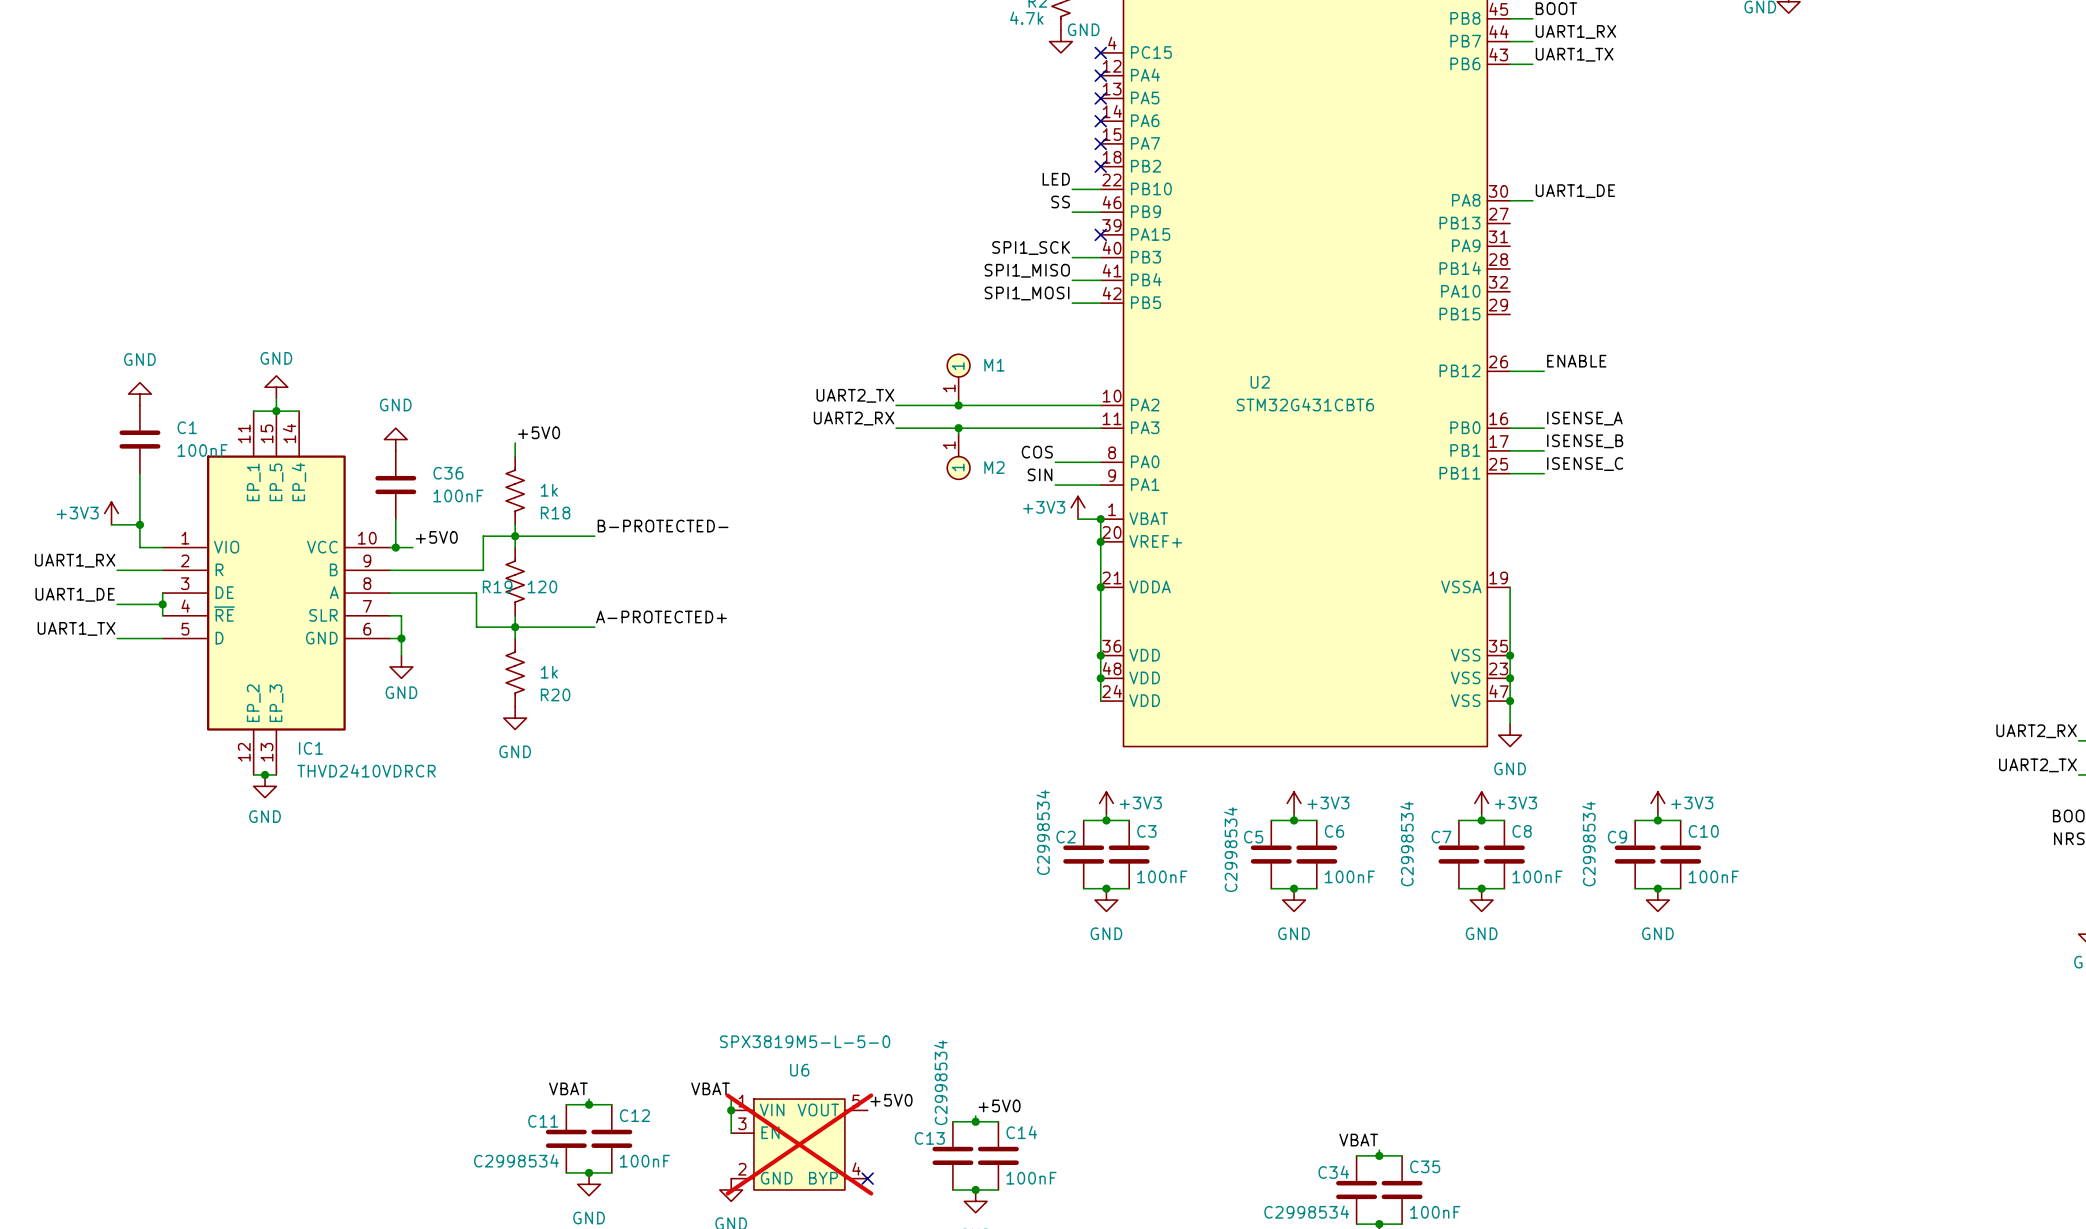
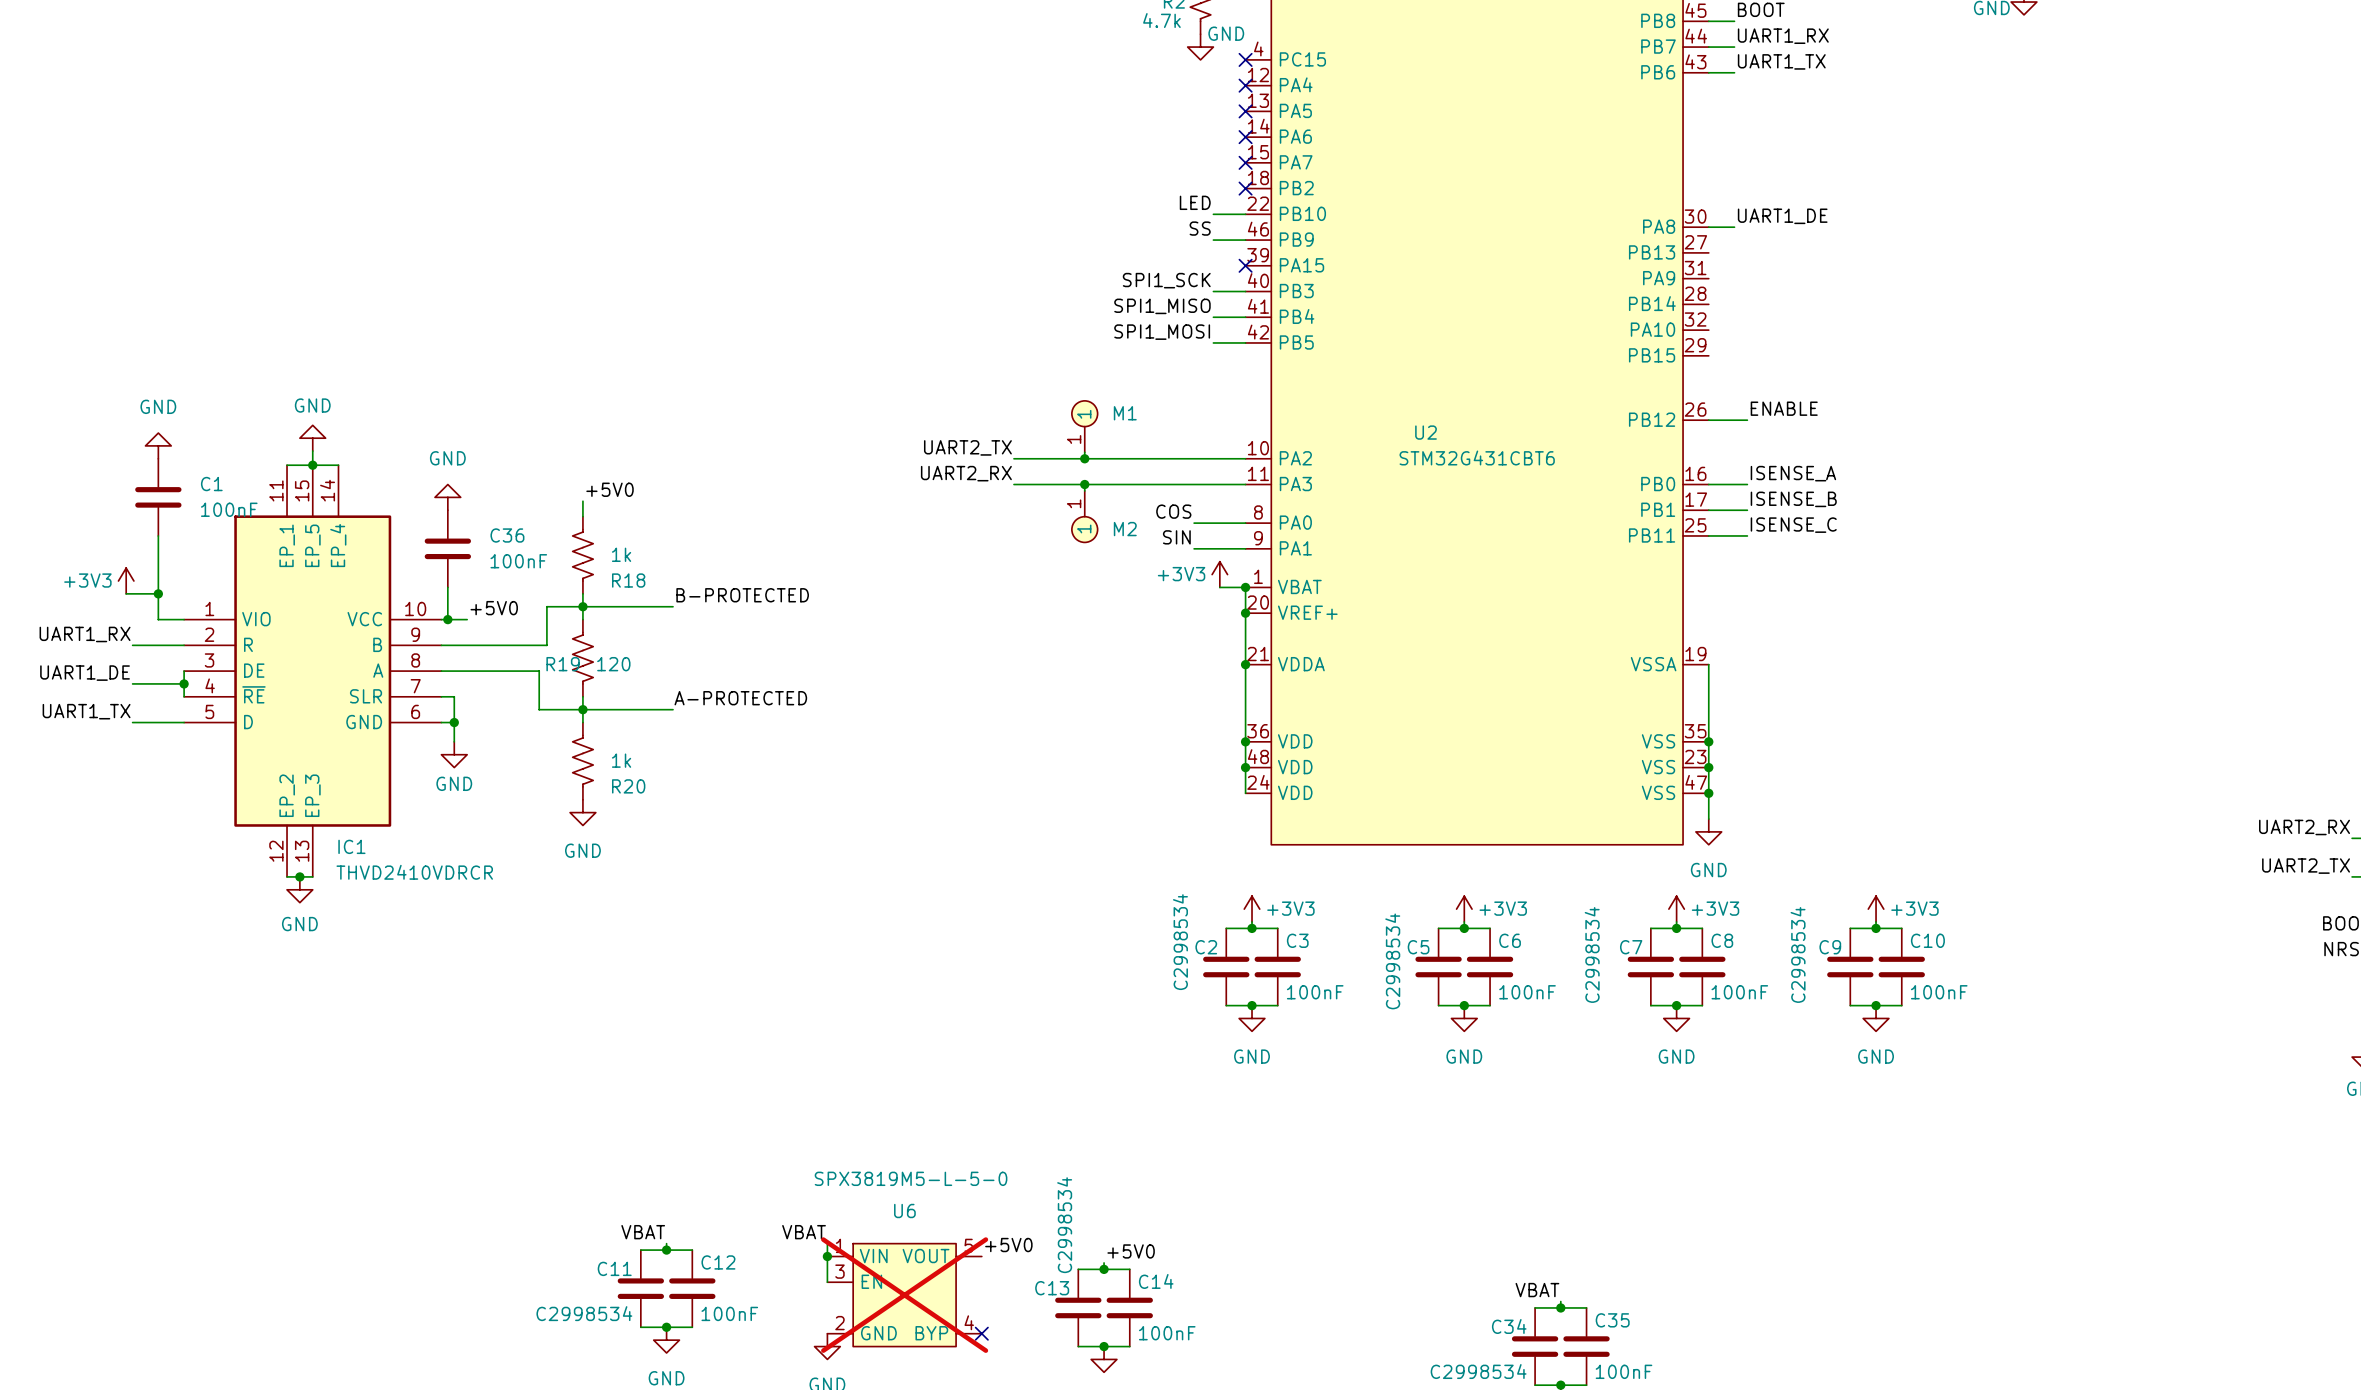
label: B-PROTECTED- (663, 526) -> B-PROTECTED (742, 595)
label: A-PROTECTED+ (661, 617) -> A-PROTECTED (740, 698)

